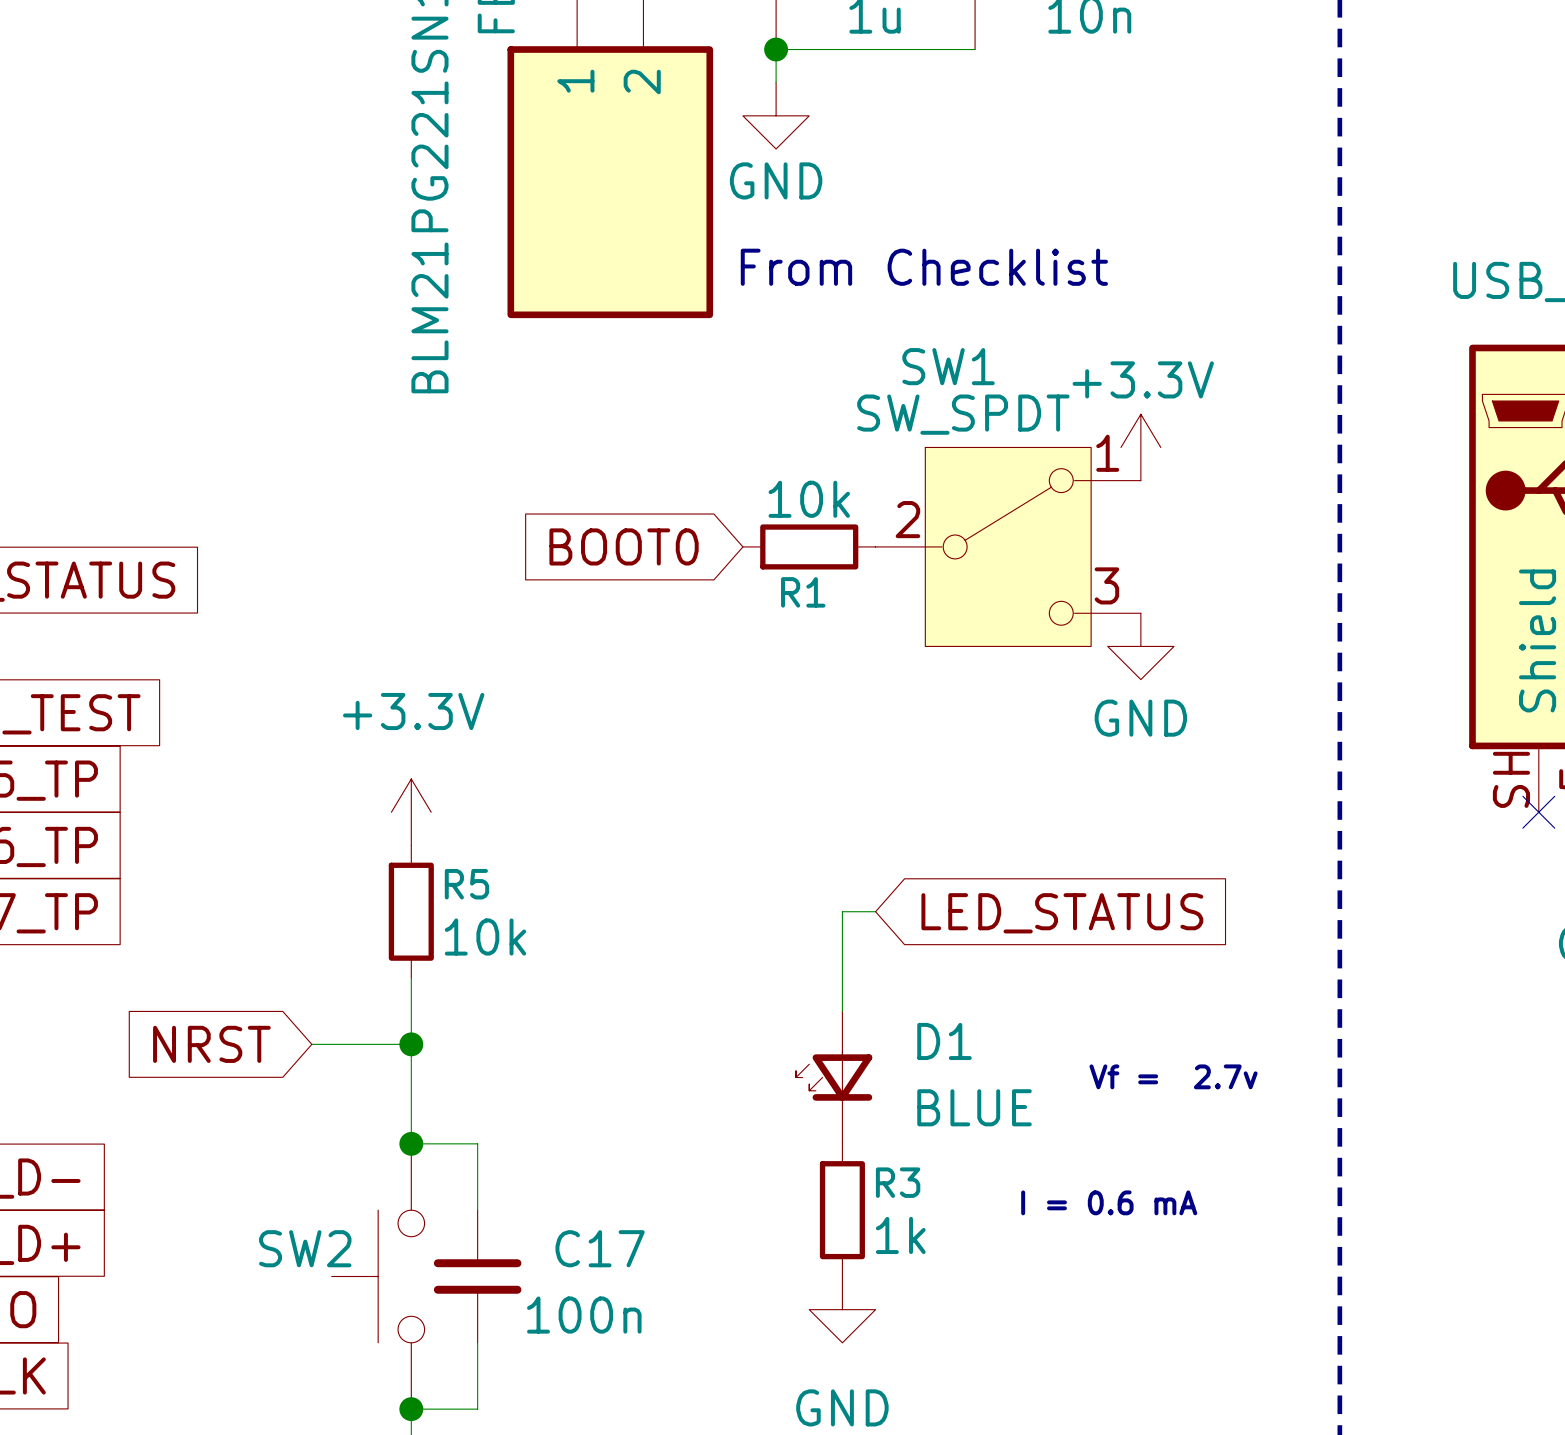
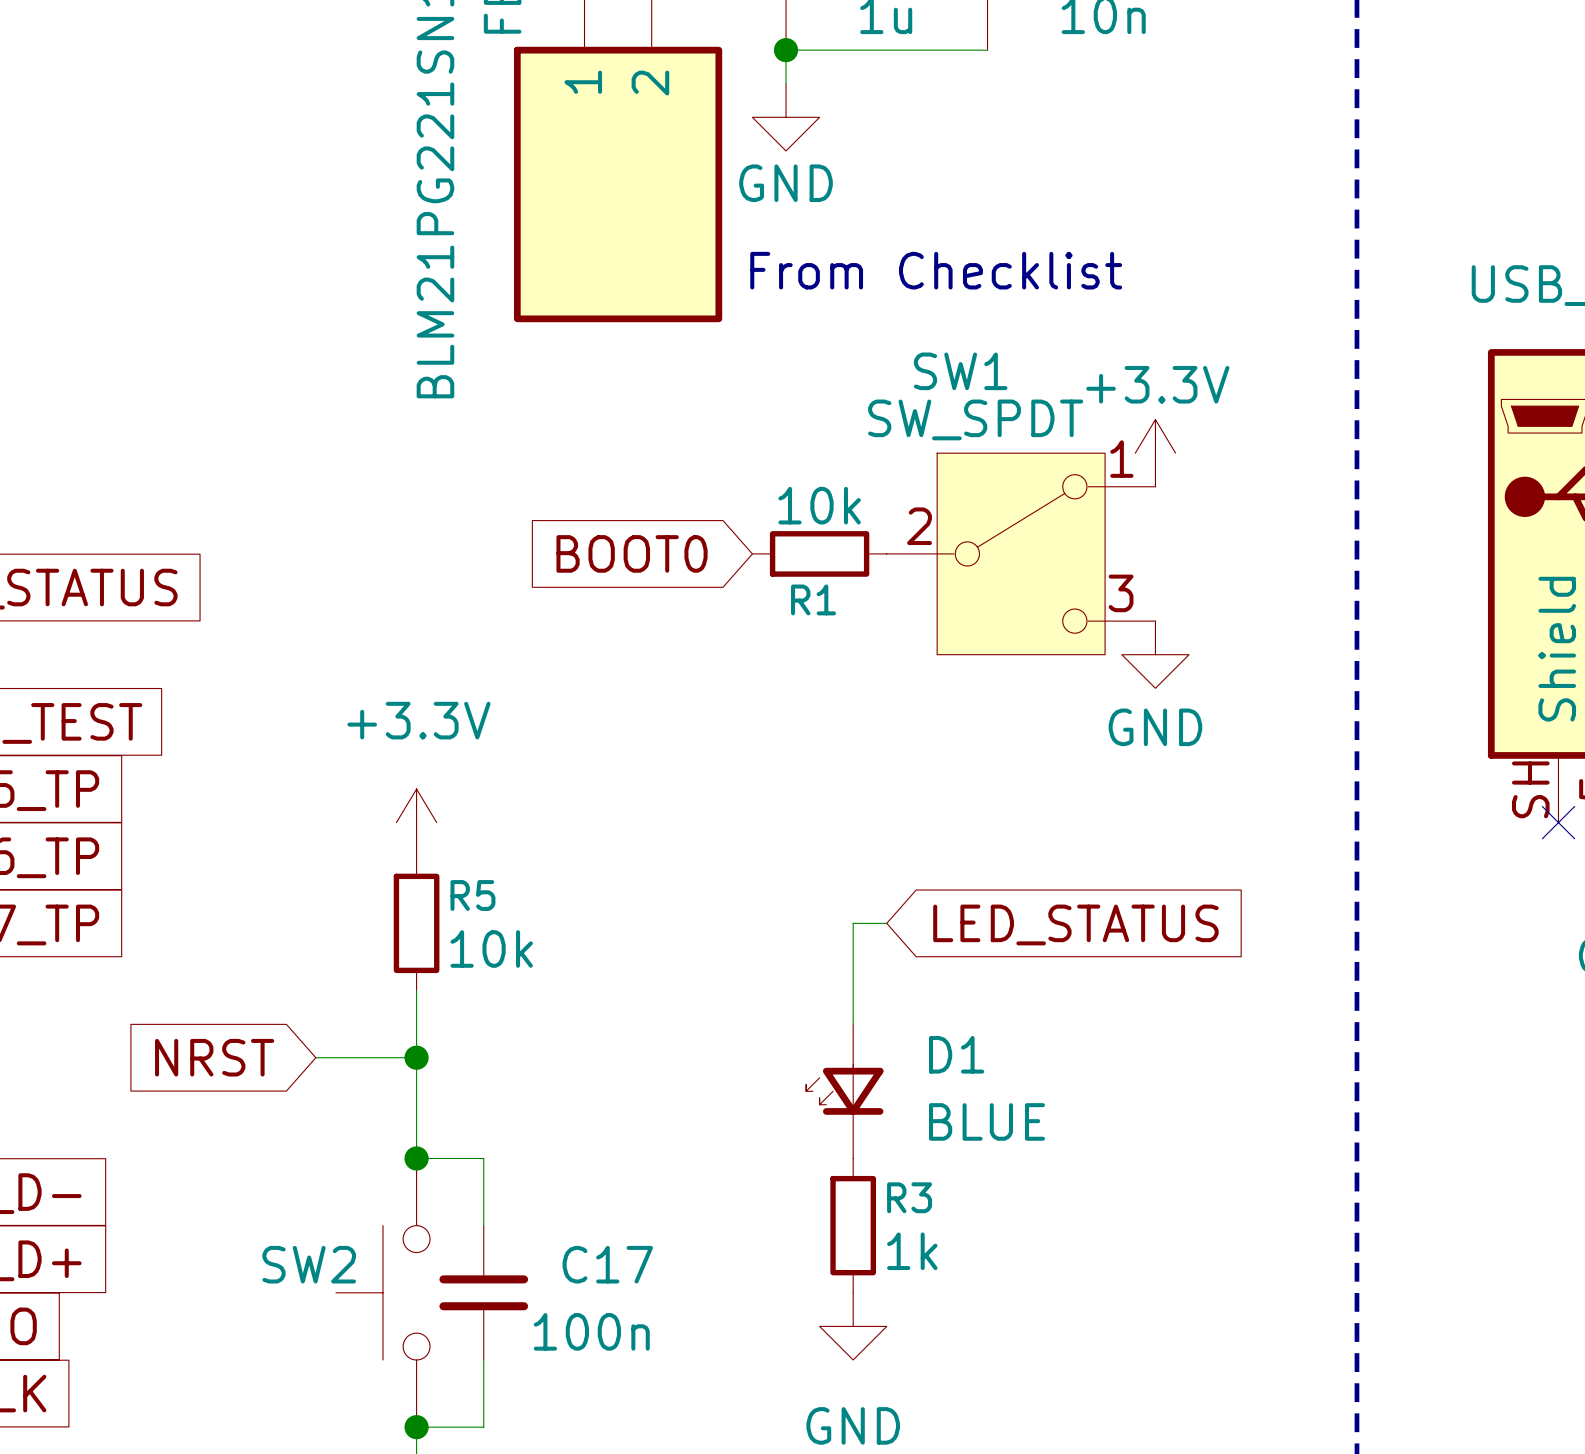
text: Vf = 2.7v (1173, 1076) -> none
text: I = 0.6 mA (1109, 1202) -> none

